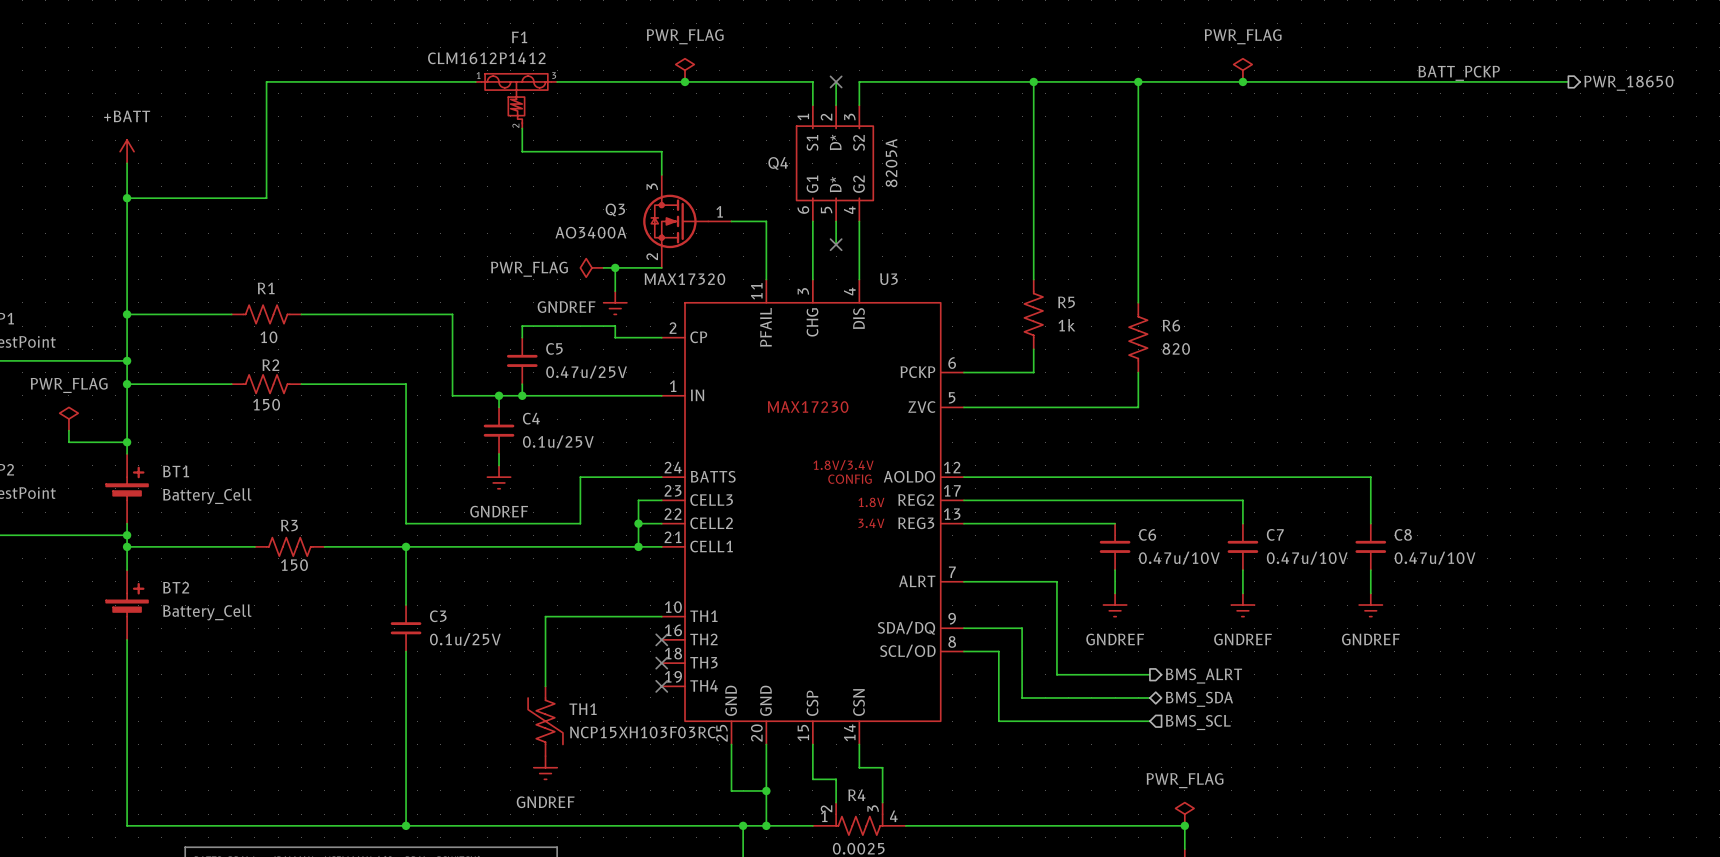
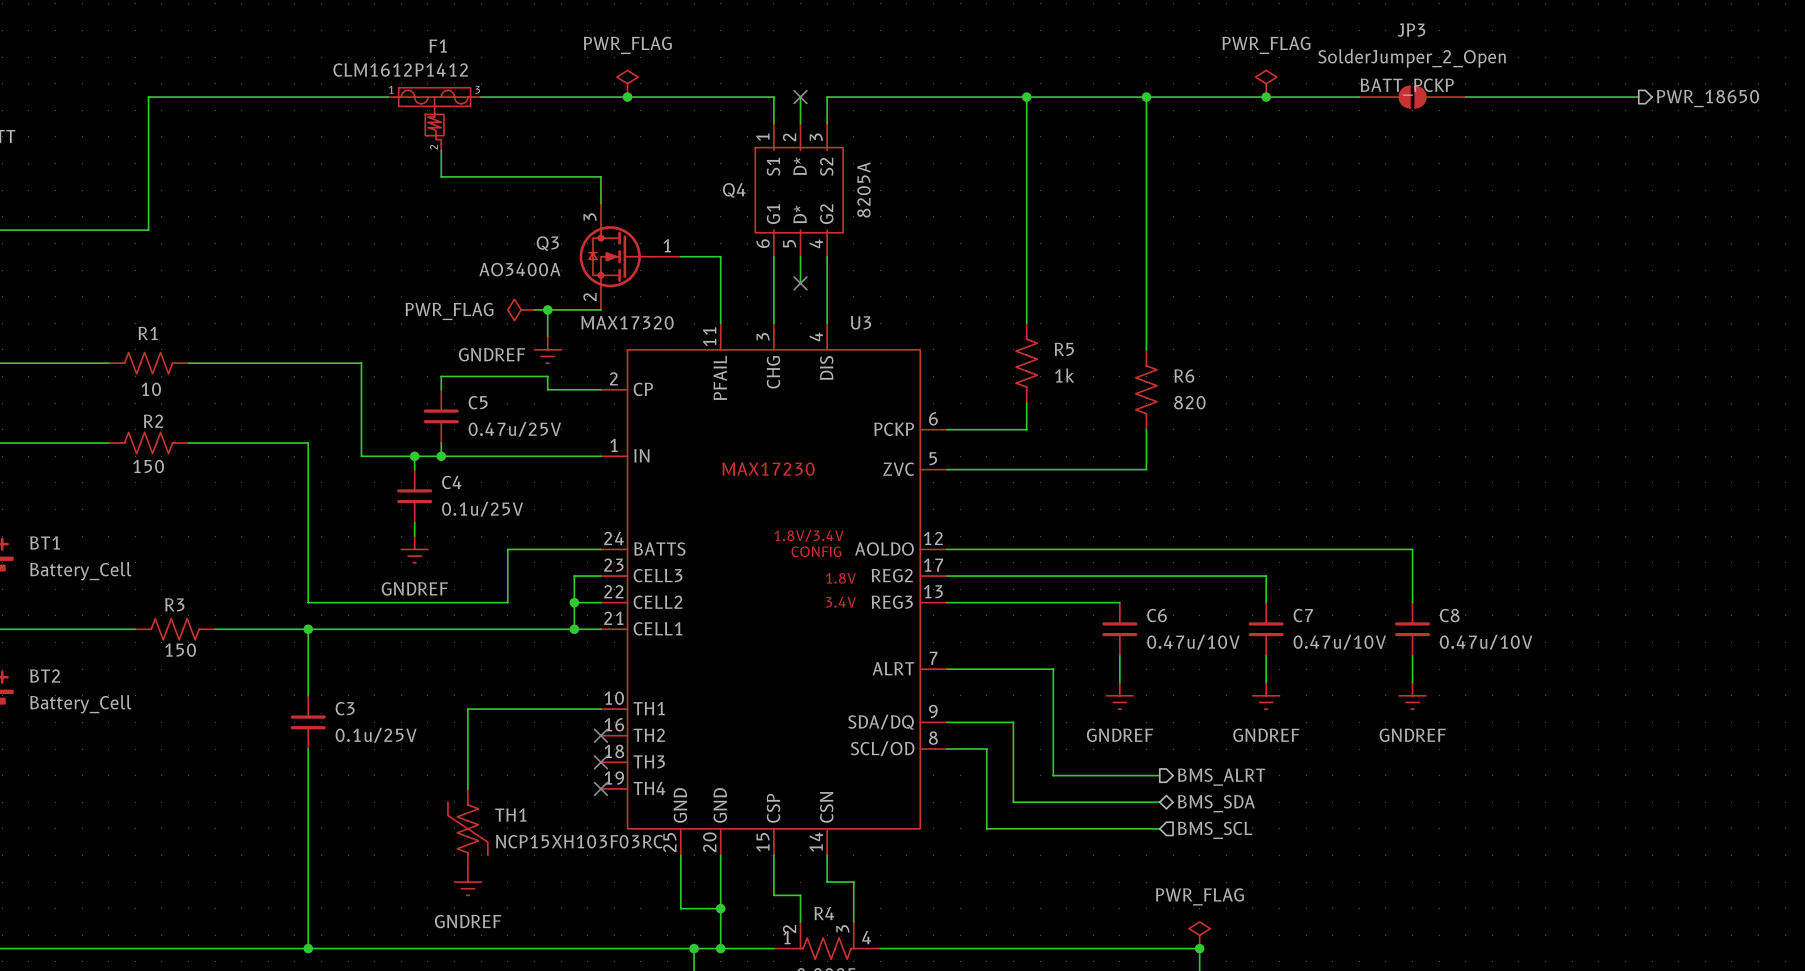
label position: BATT_PCKP (1459, 73) -> BATT_PCKP (1407, 87)
JP3: none -> SolderJumper_2_Open (1412, 97)

